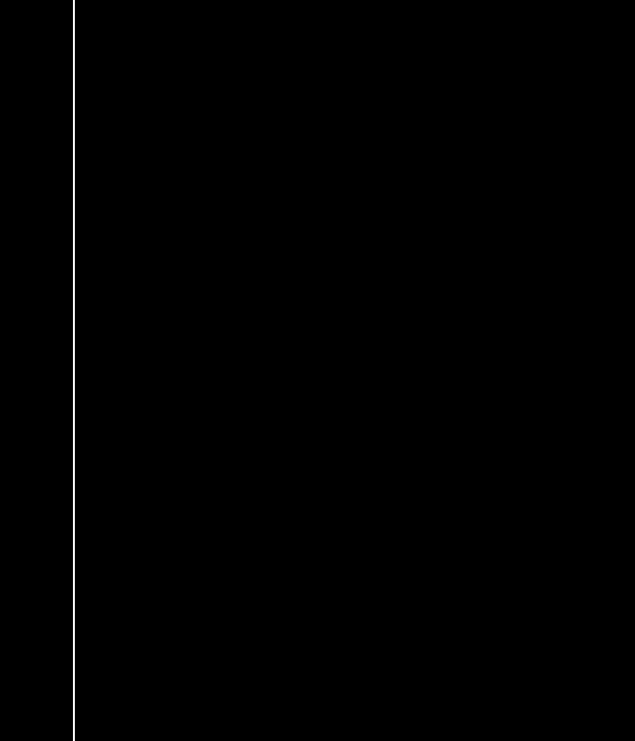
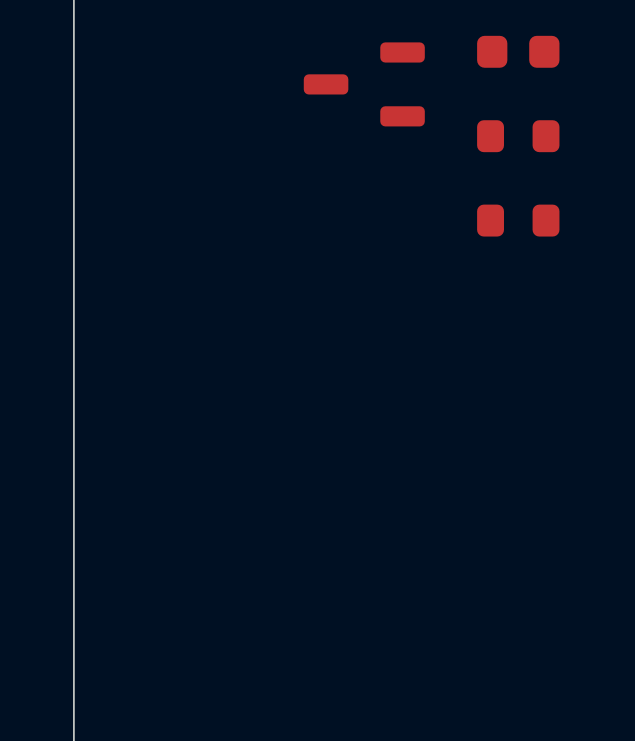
part: none -> (518, 51)
part: none -> (364, 84)
part: none -> (518, 136)
part: none -> (518, 220)

